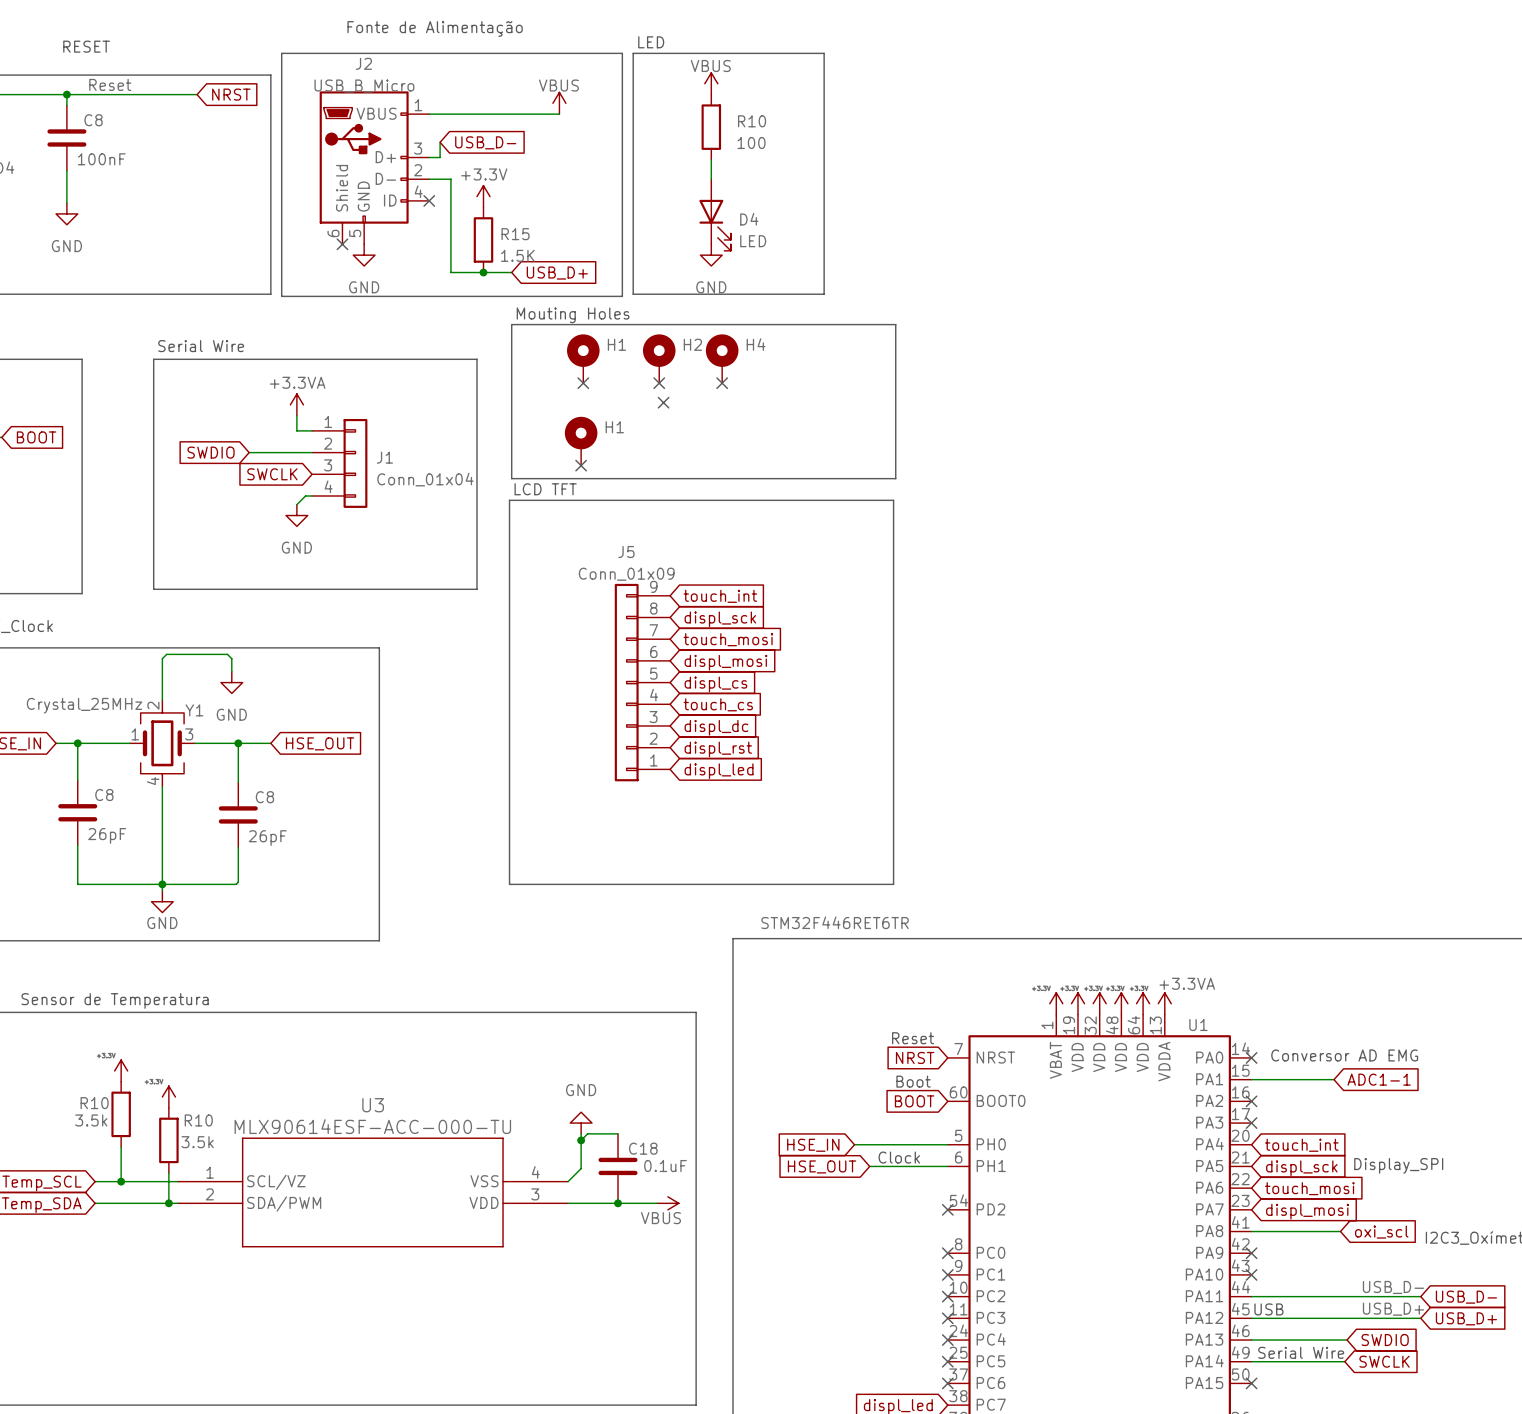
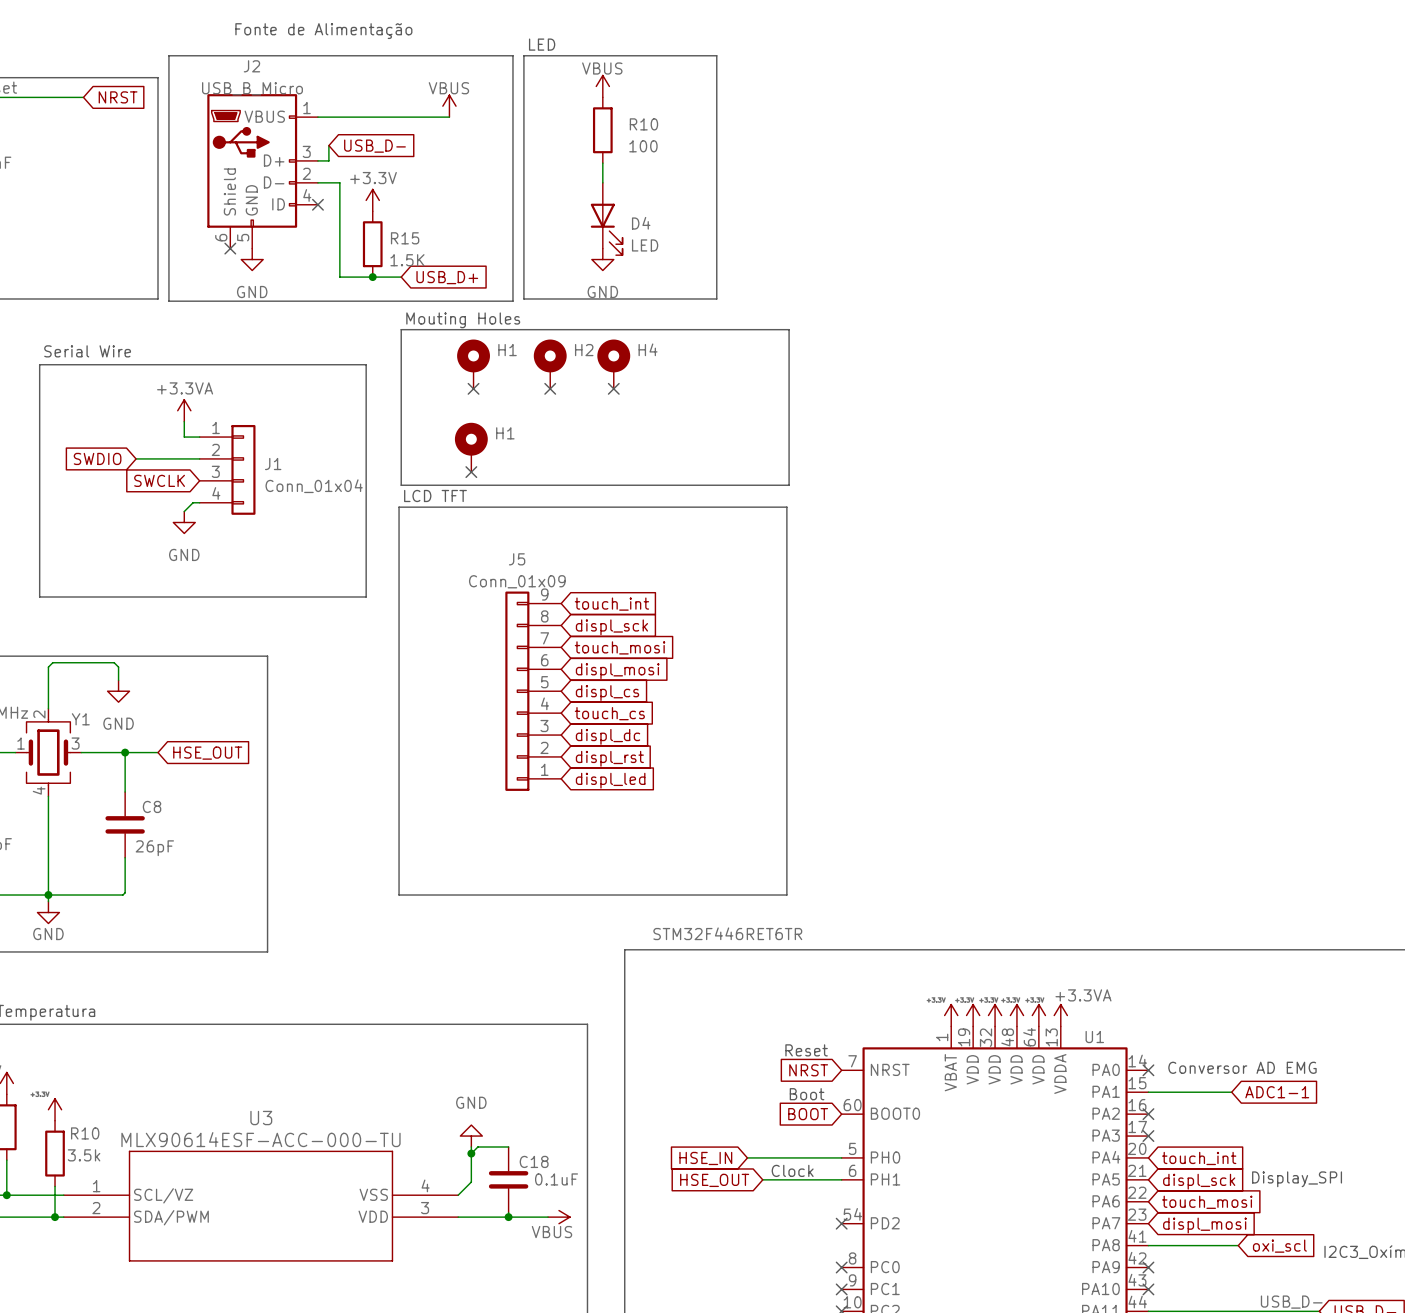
no-connect mark: (663, 402) -> none

